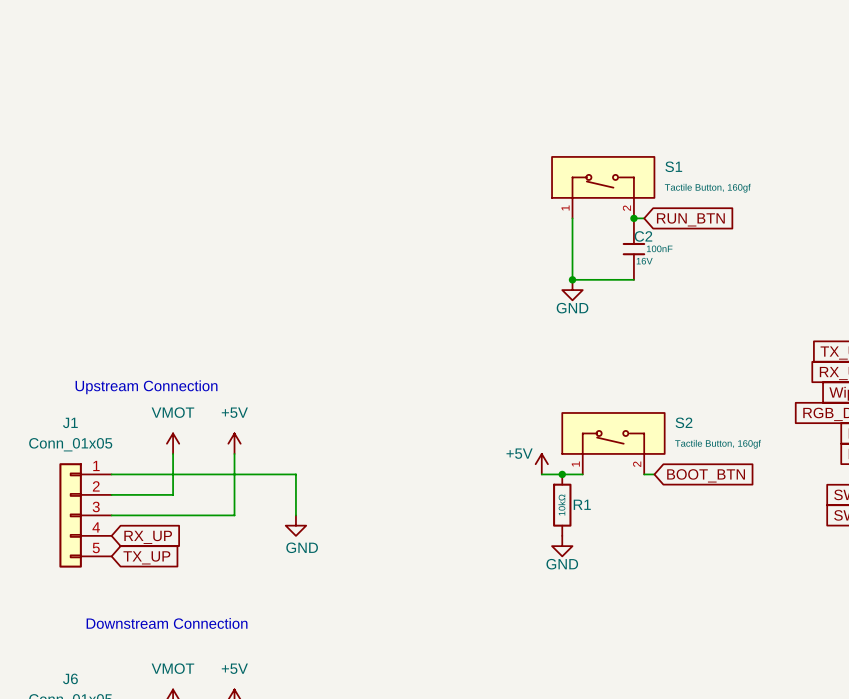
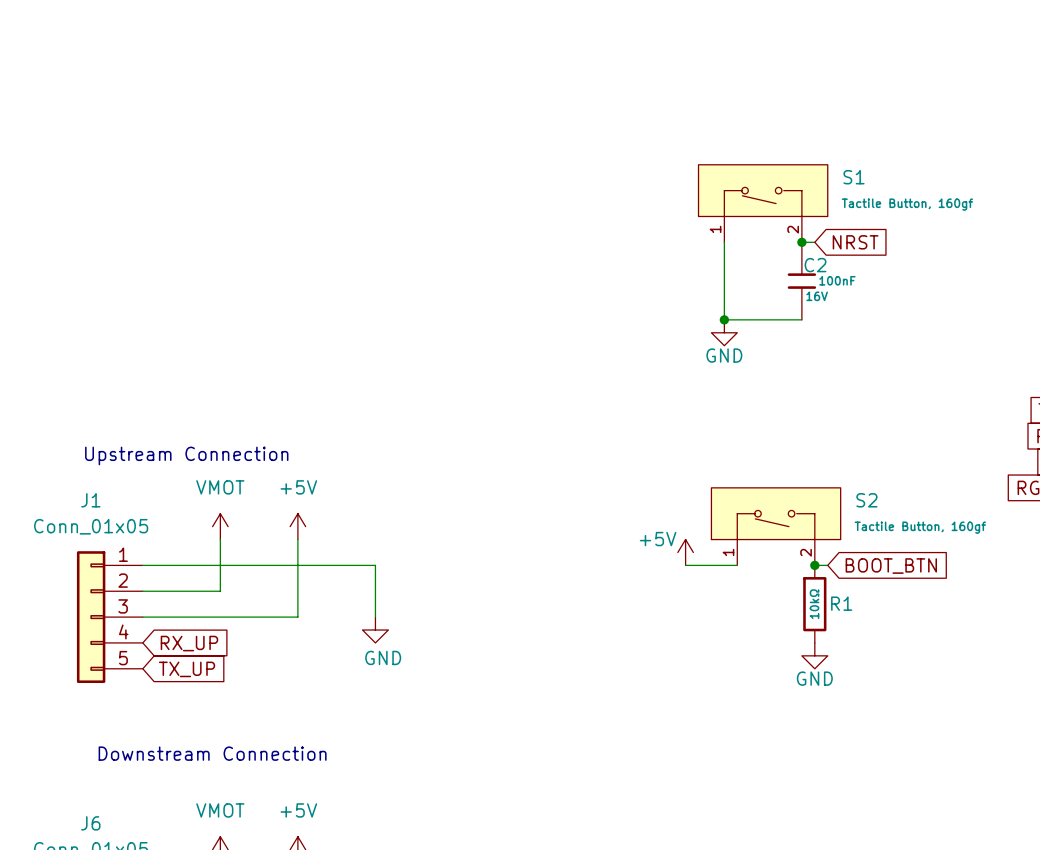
global label: RUN_BTN (690, 219) -> NRST (855, 242)
junction: (562, 474) -> none
junction: none -> (814, 565)
R1 position: (562, 505) -> (814, 604)
power symbol position: GND (562, 546) -> GND (814, 655)

